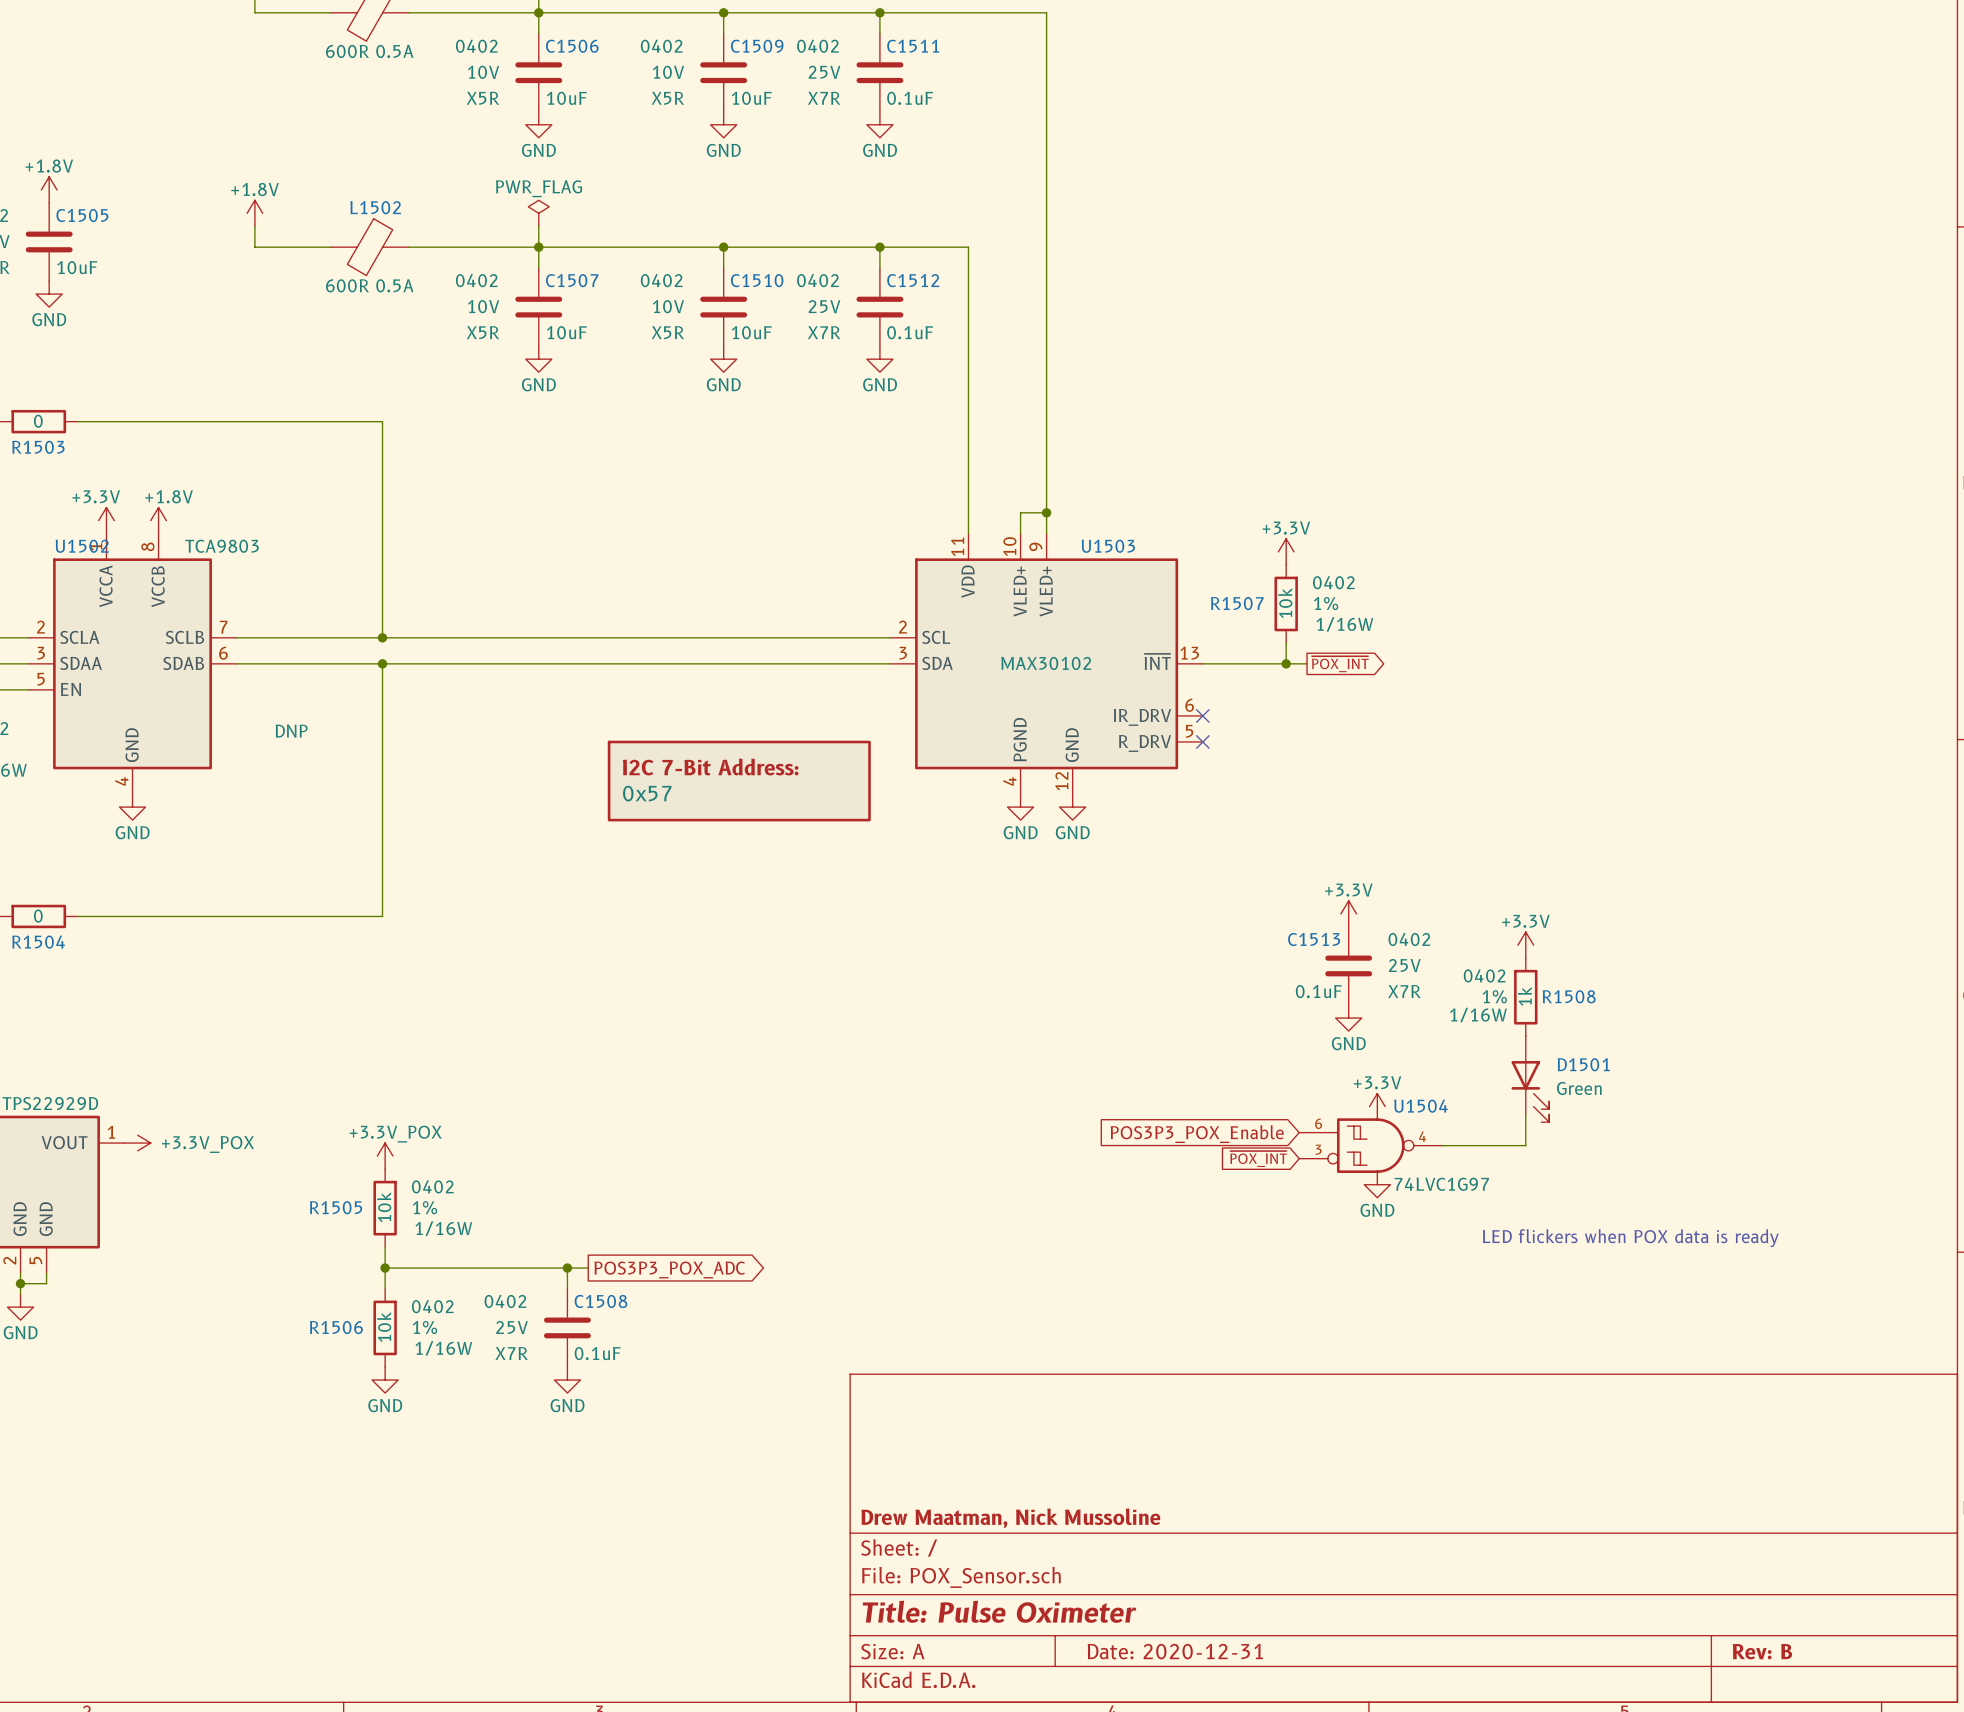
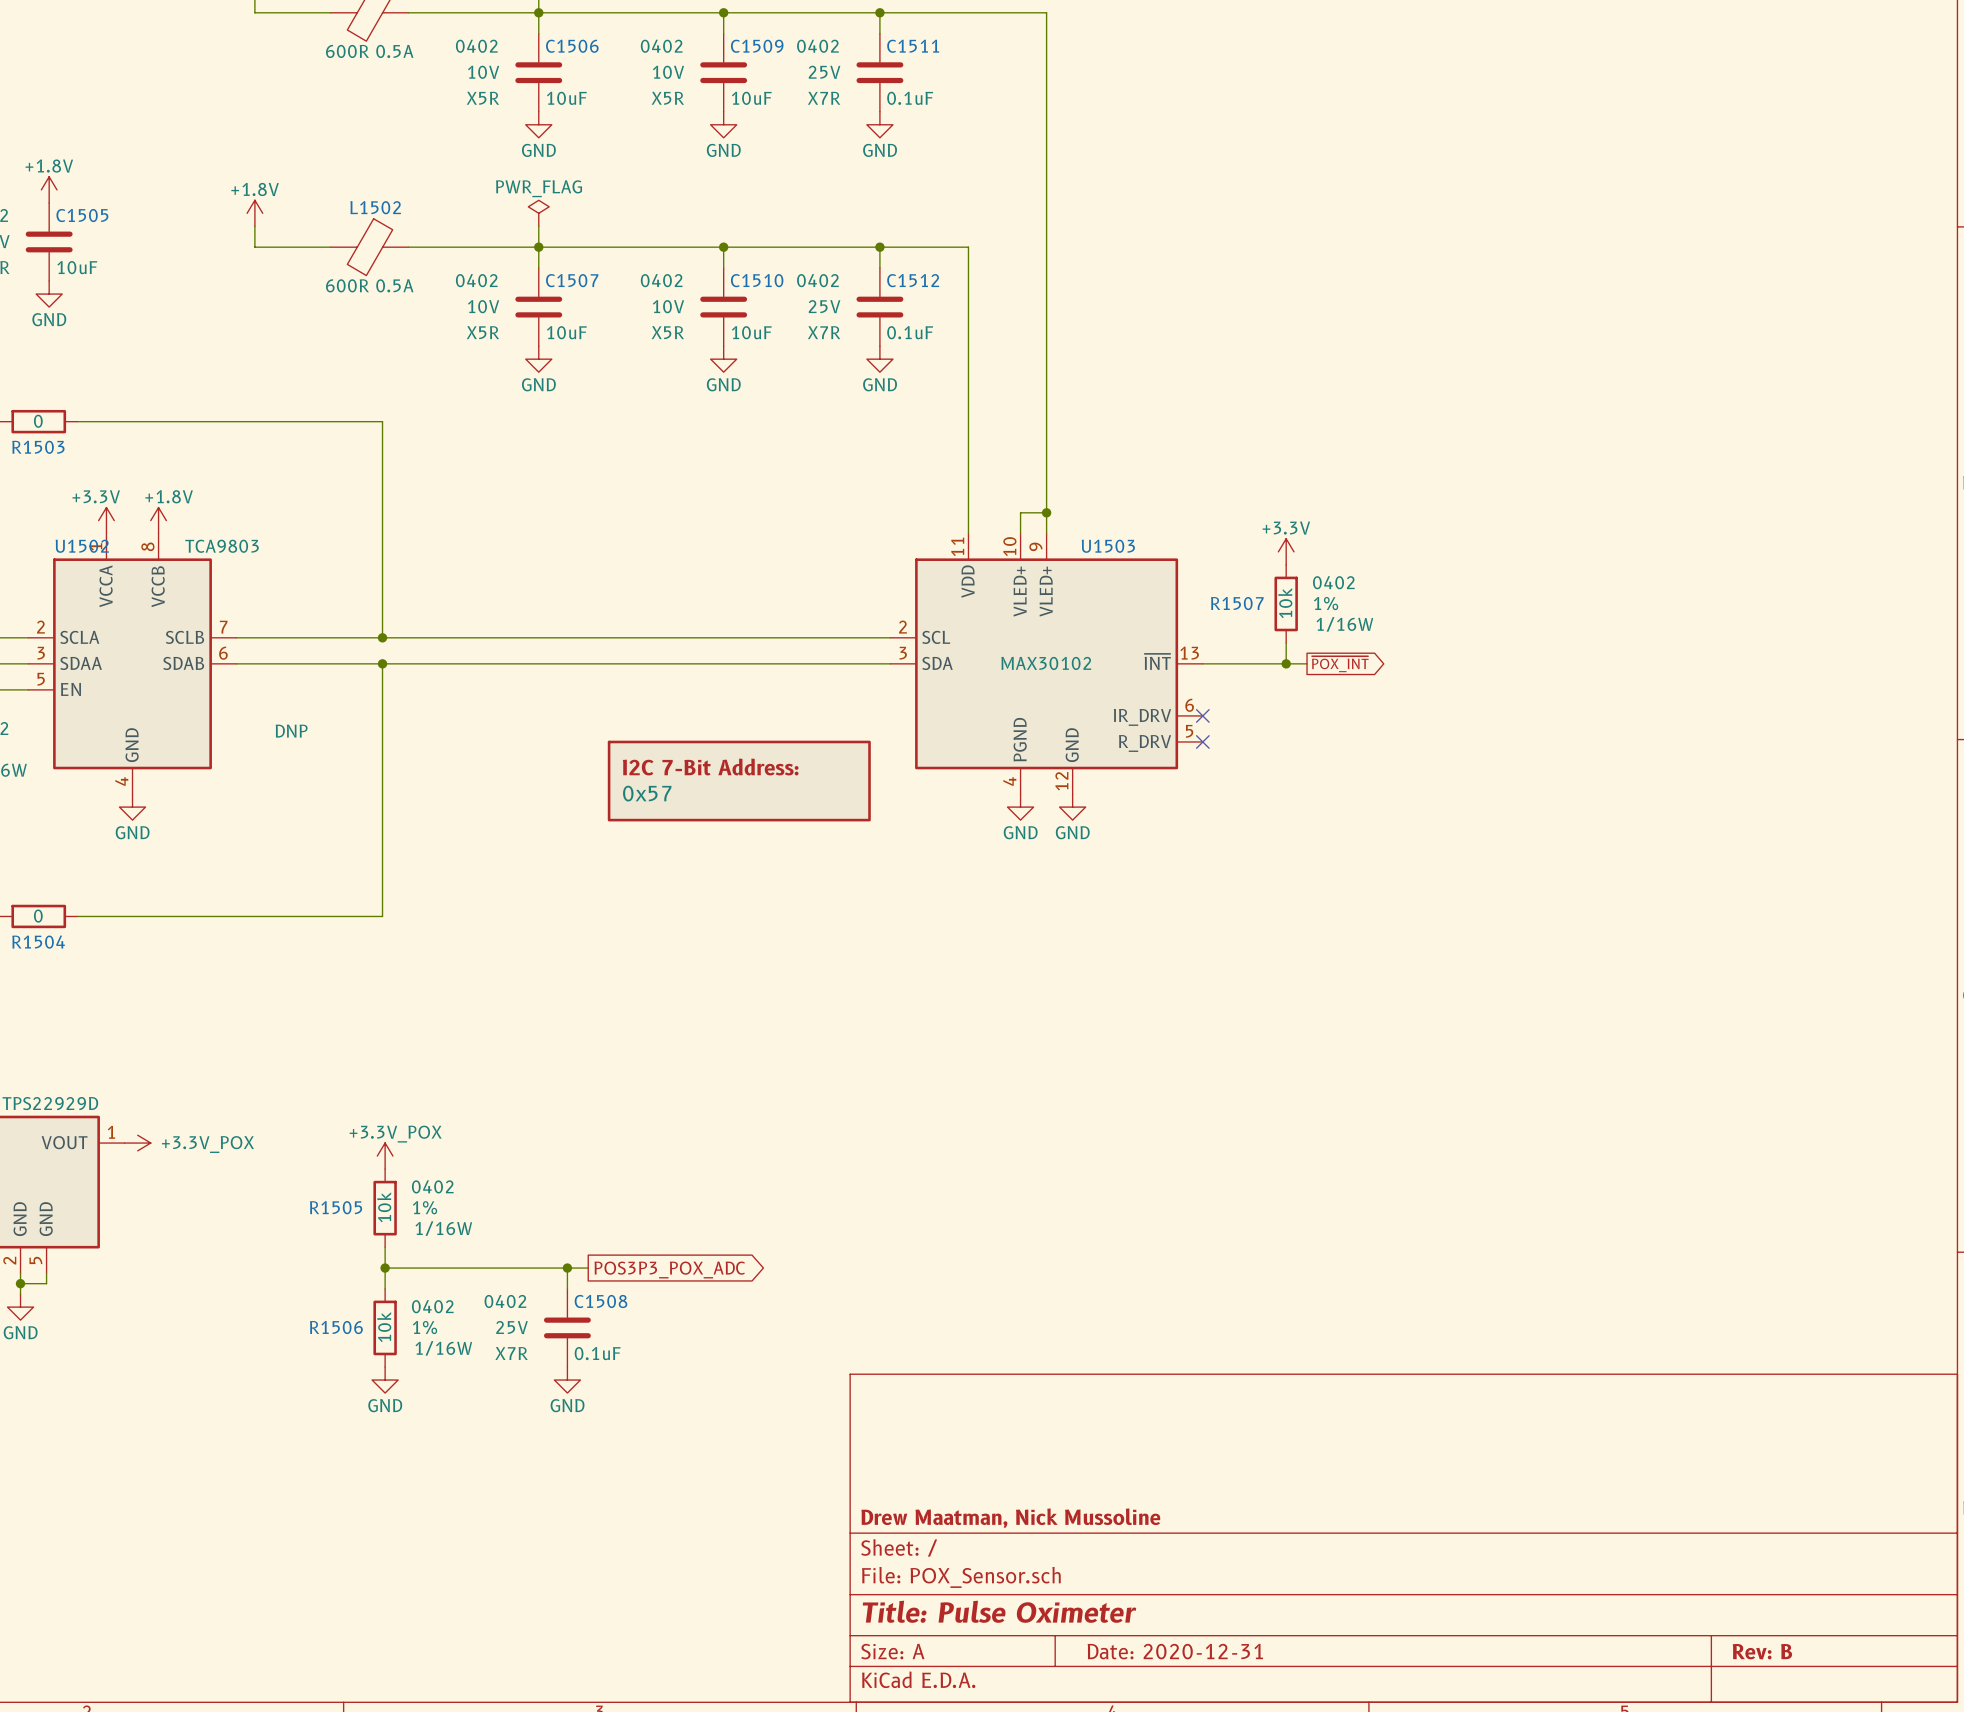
power symbol: +3.3V (1348, 913) -> none
power symbol: +3.3V (1525, 945) -> none
C1513: 0.1uF (1348, 965) -> none
R1508: 1k (1525, 997) -> none
power symbol: GND (1348, 1018) -> none
D1501: Green (1530, 1079) -> none
power symbol: +3.3V (1377, 1106) -> none
wire: (1525, 1114) (1525, 1145) (1442, 1145) -> none
global label: POS3P3_POX_Enable (1197, 1134) -> none
U1504: 74LVC1G97 (1370, 1145) -> none
global label: ~{POX_INT} (1258, 1159) -> none
power symbol: GND (1377, 1184) -> none
text: LED flickers when POX data is ready (1630, 1238) -> none

